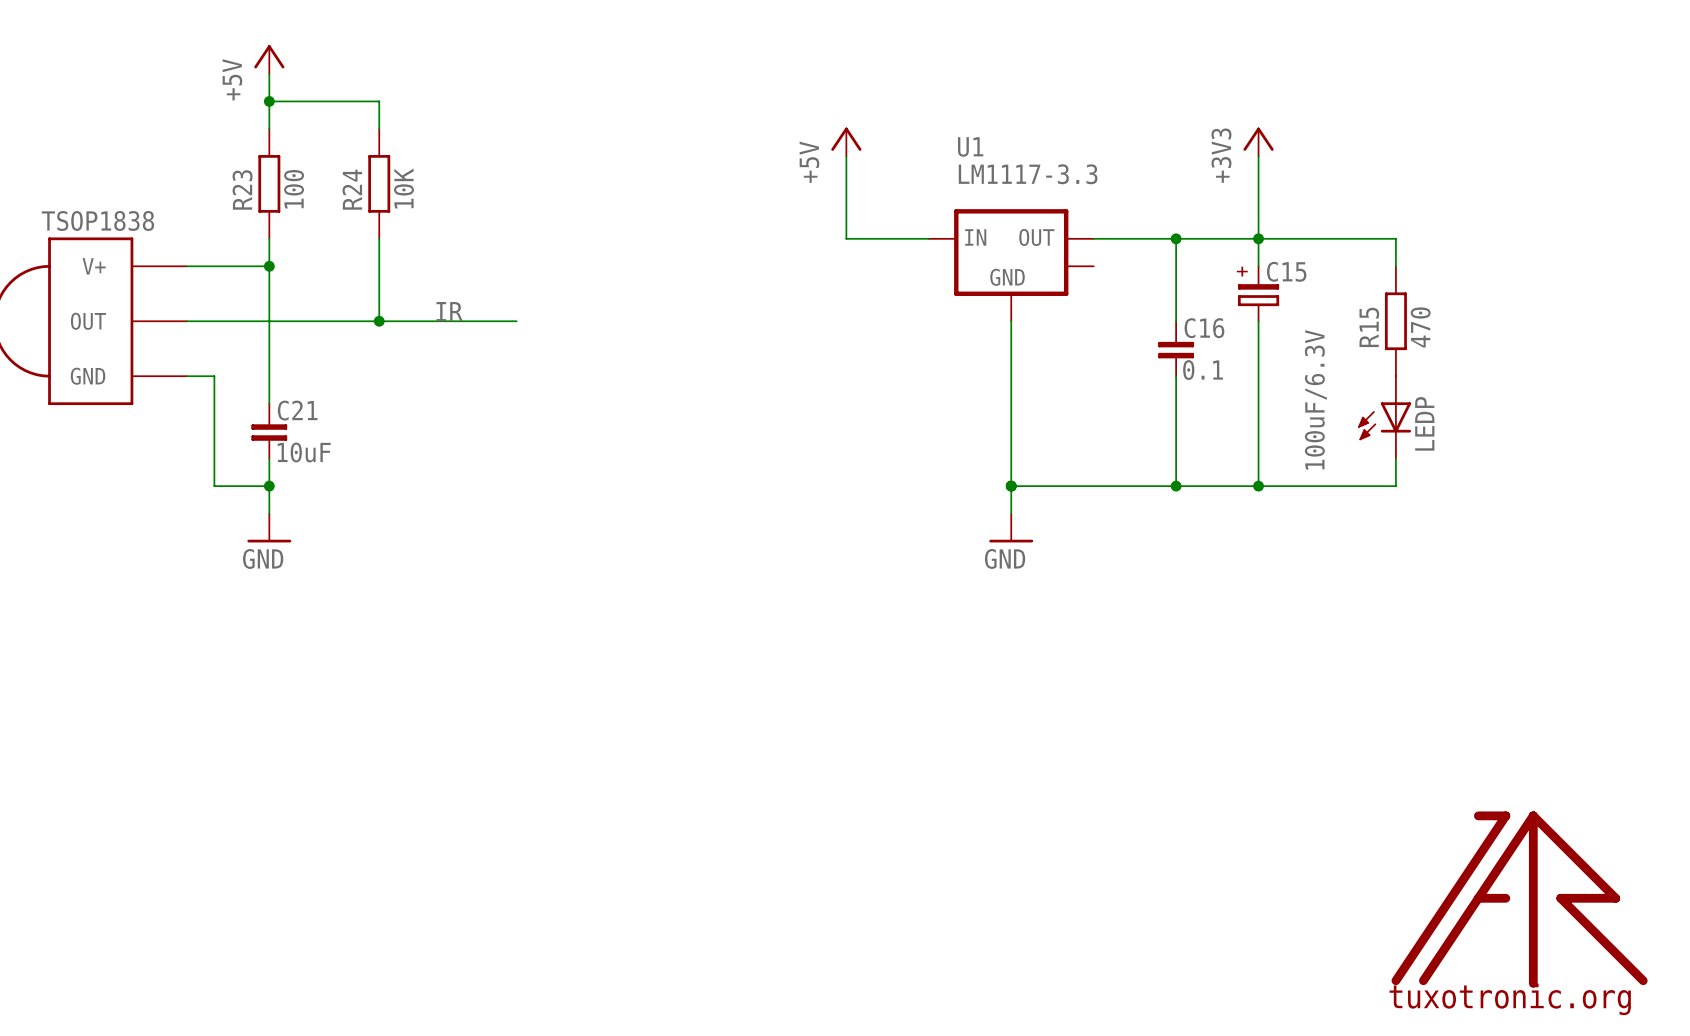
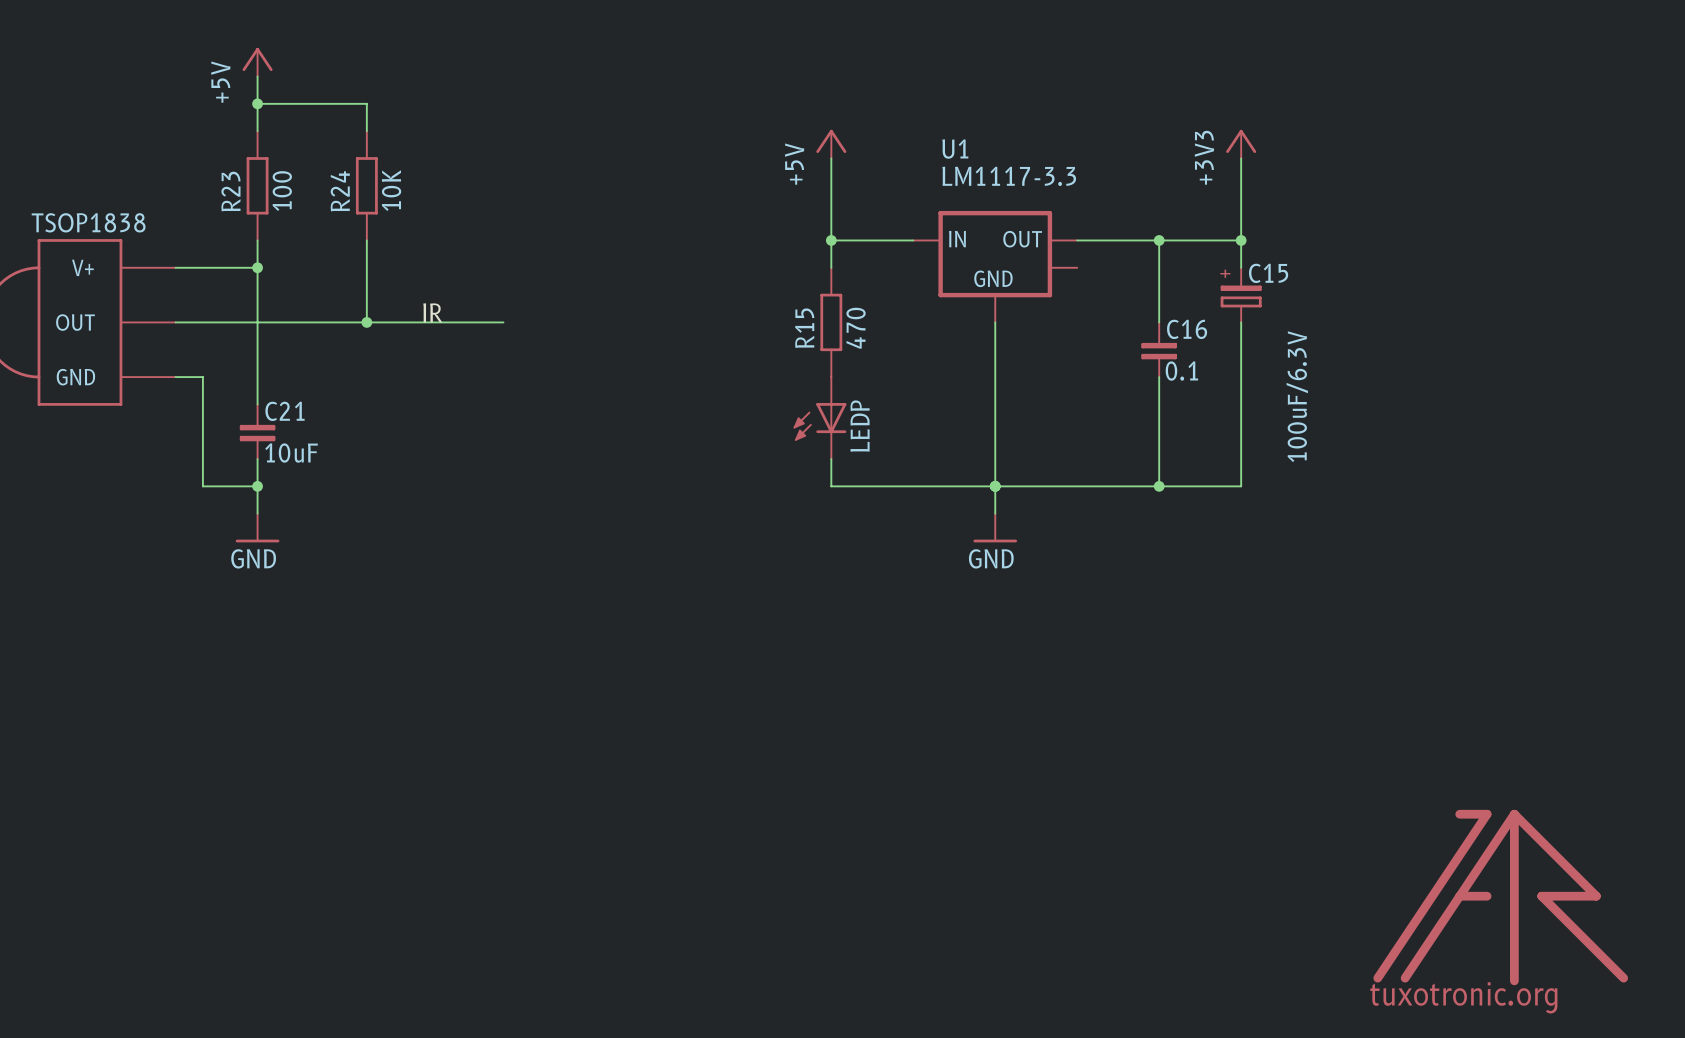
wire: none -> (831, 240) (831, 267)
junction: none -> (831, 240)
wire: (1258, 238) (1395, 238) (1395, 266) -> none
R15 position: (1395, 321) -> (831, 322)
LEDP: none -> (819, 418)
LEDP: (1384, 417) -> none
wire: none -> (831, 459) (831, 486) (995, 486)
wire: (1395, 458) (1395, 486) (1258, 486) -> none
junction: (1258, 486) -> none

